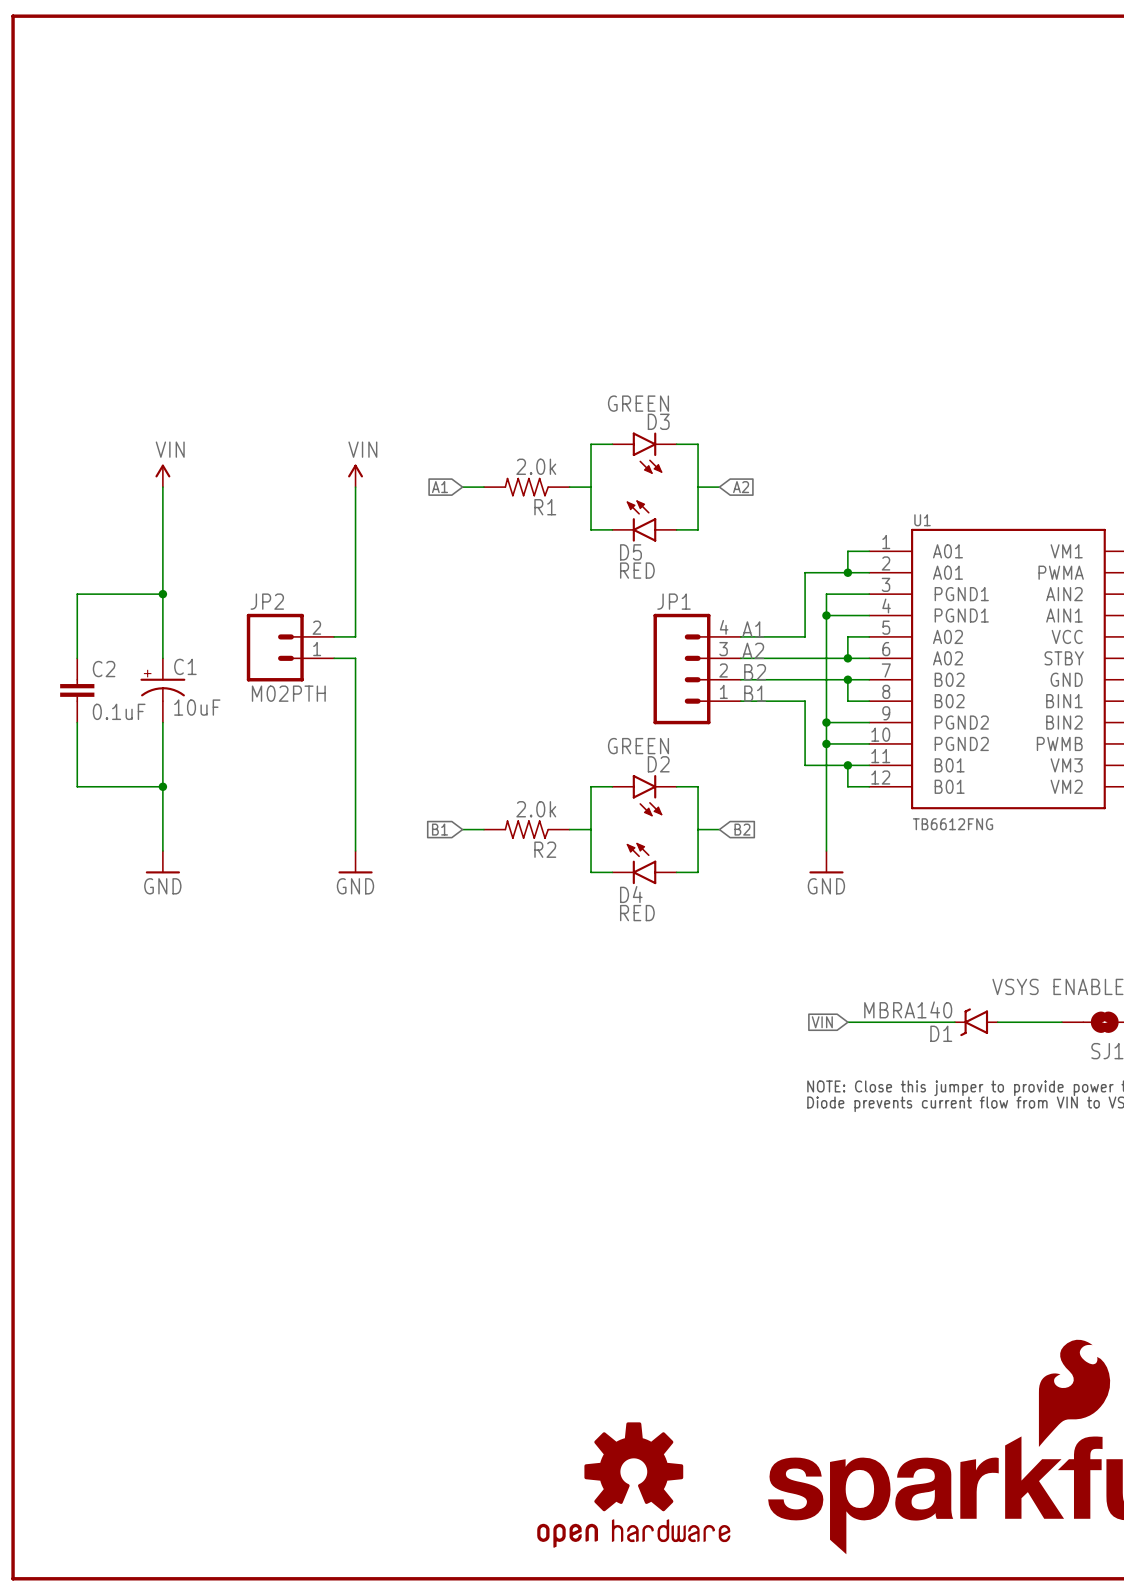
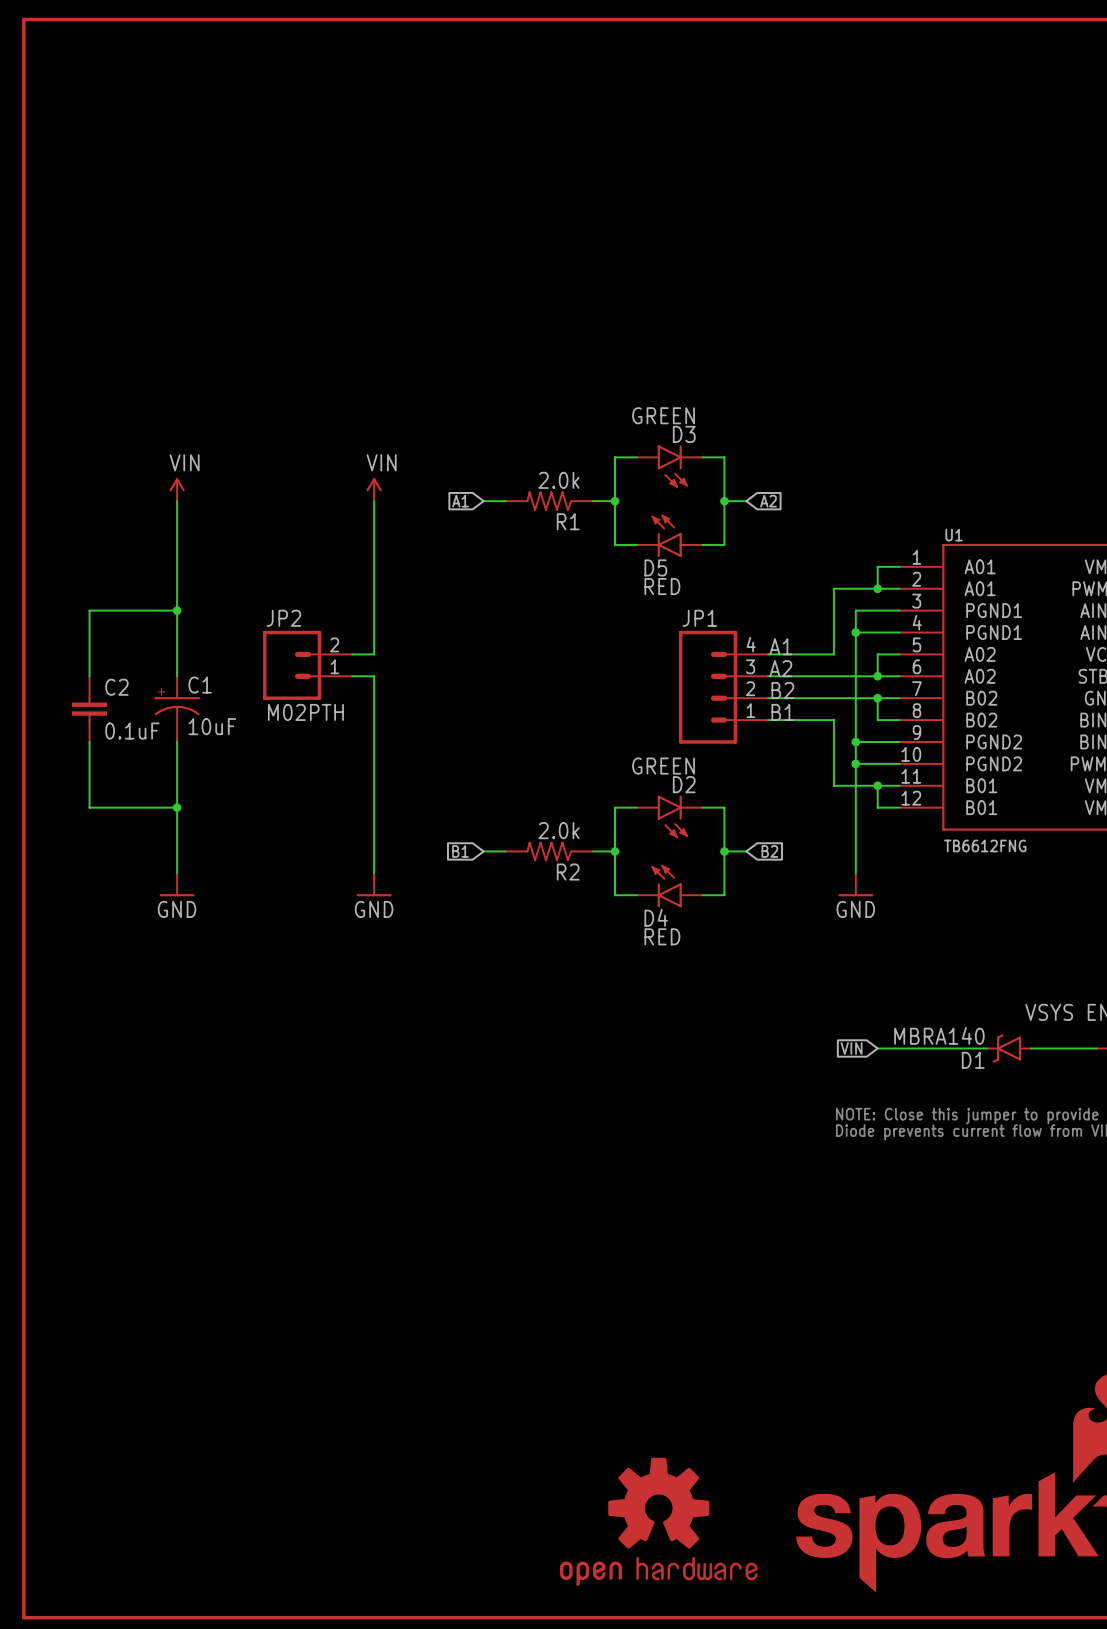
junction: none -> (614, 501)
junction: none -> (724, 501)
junction: none -> (614, 851)
junction: none -> (724, 851)

